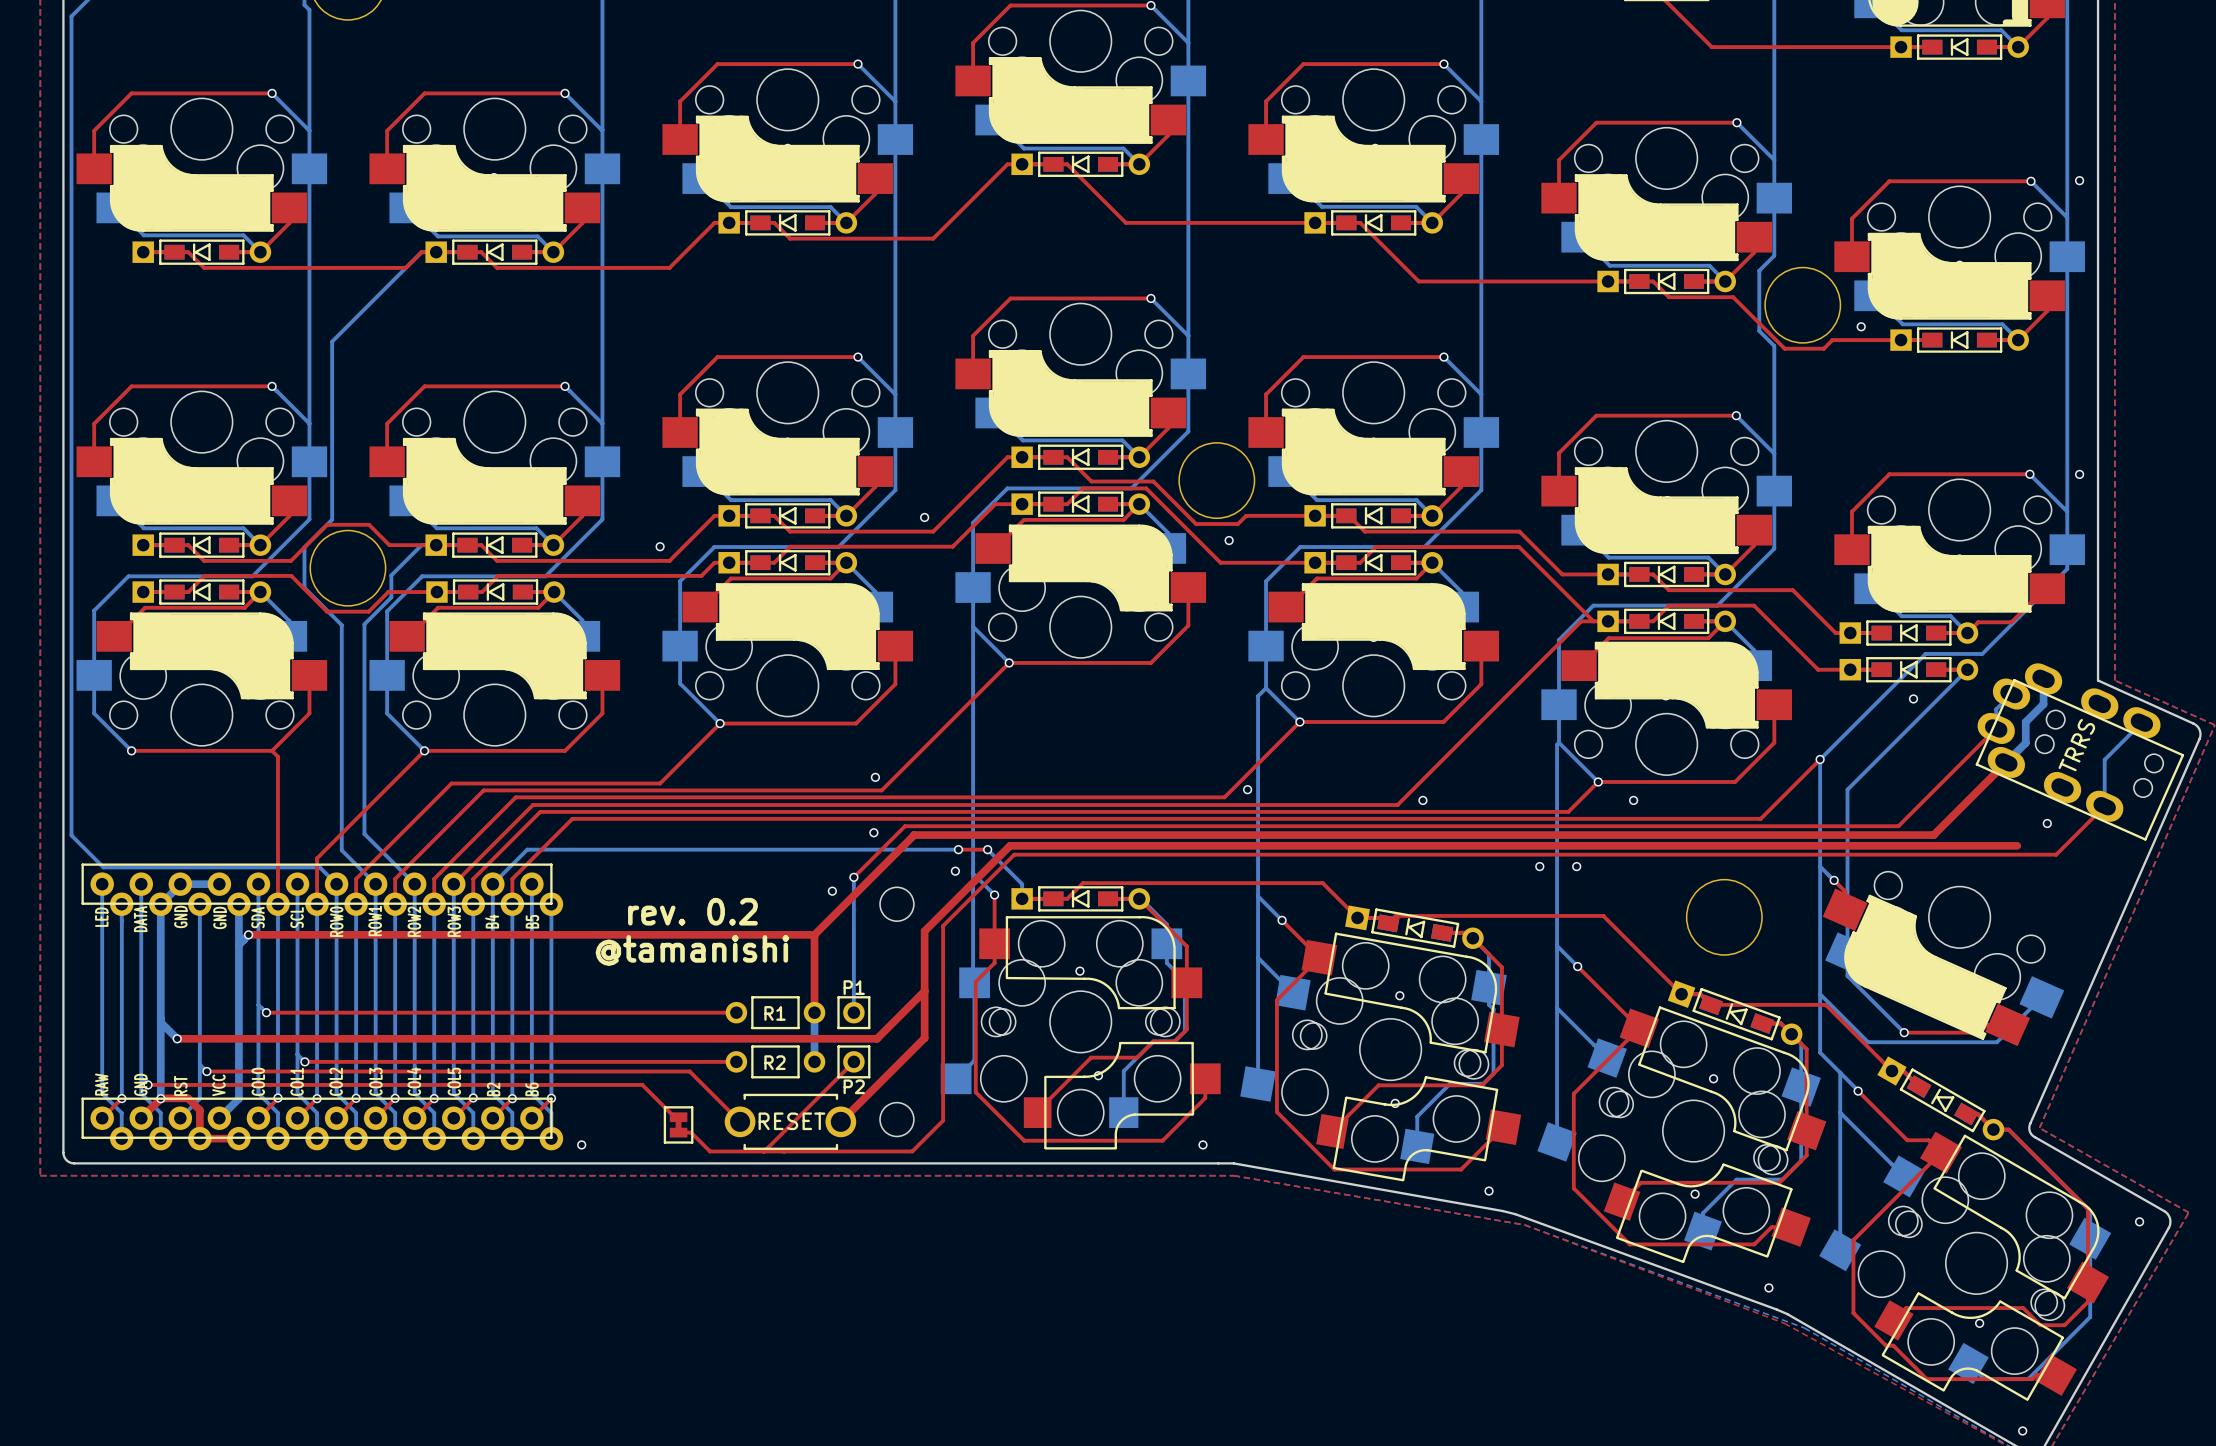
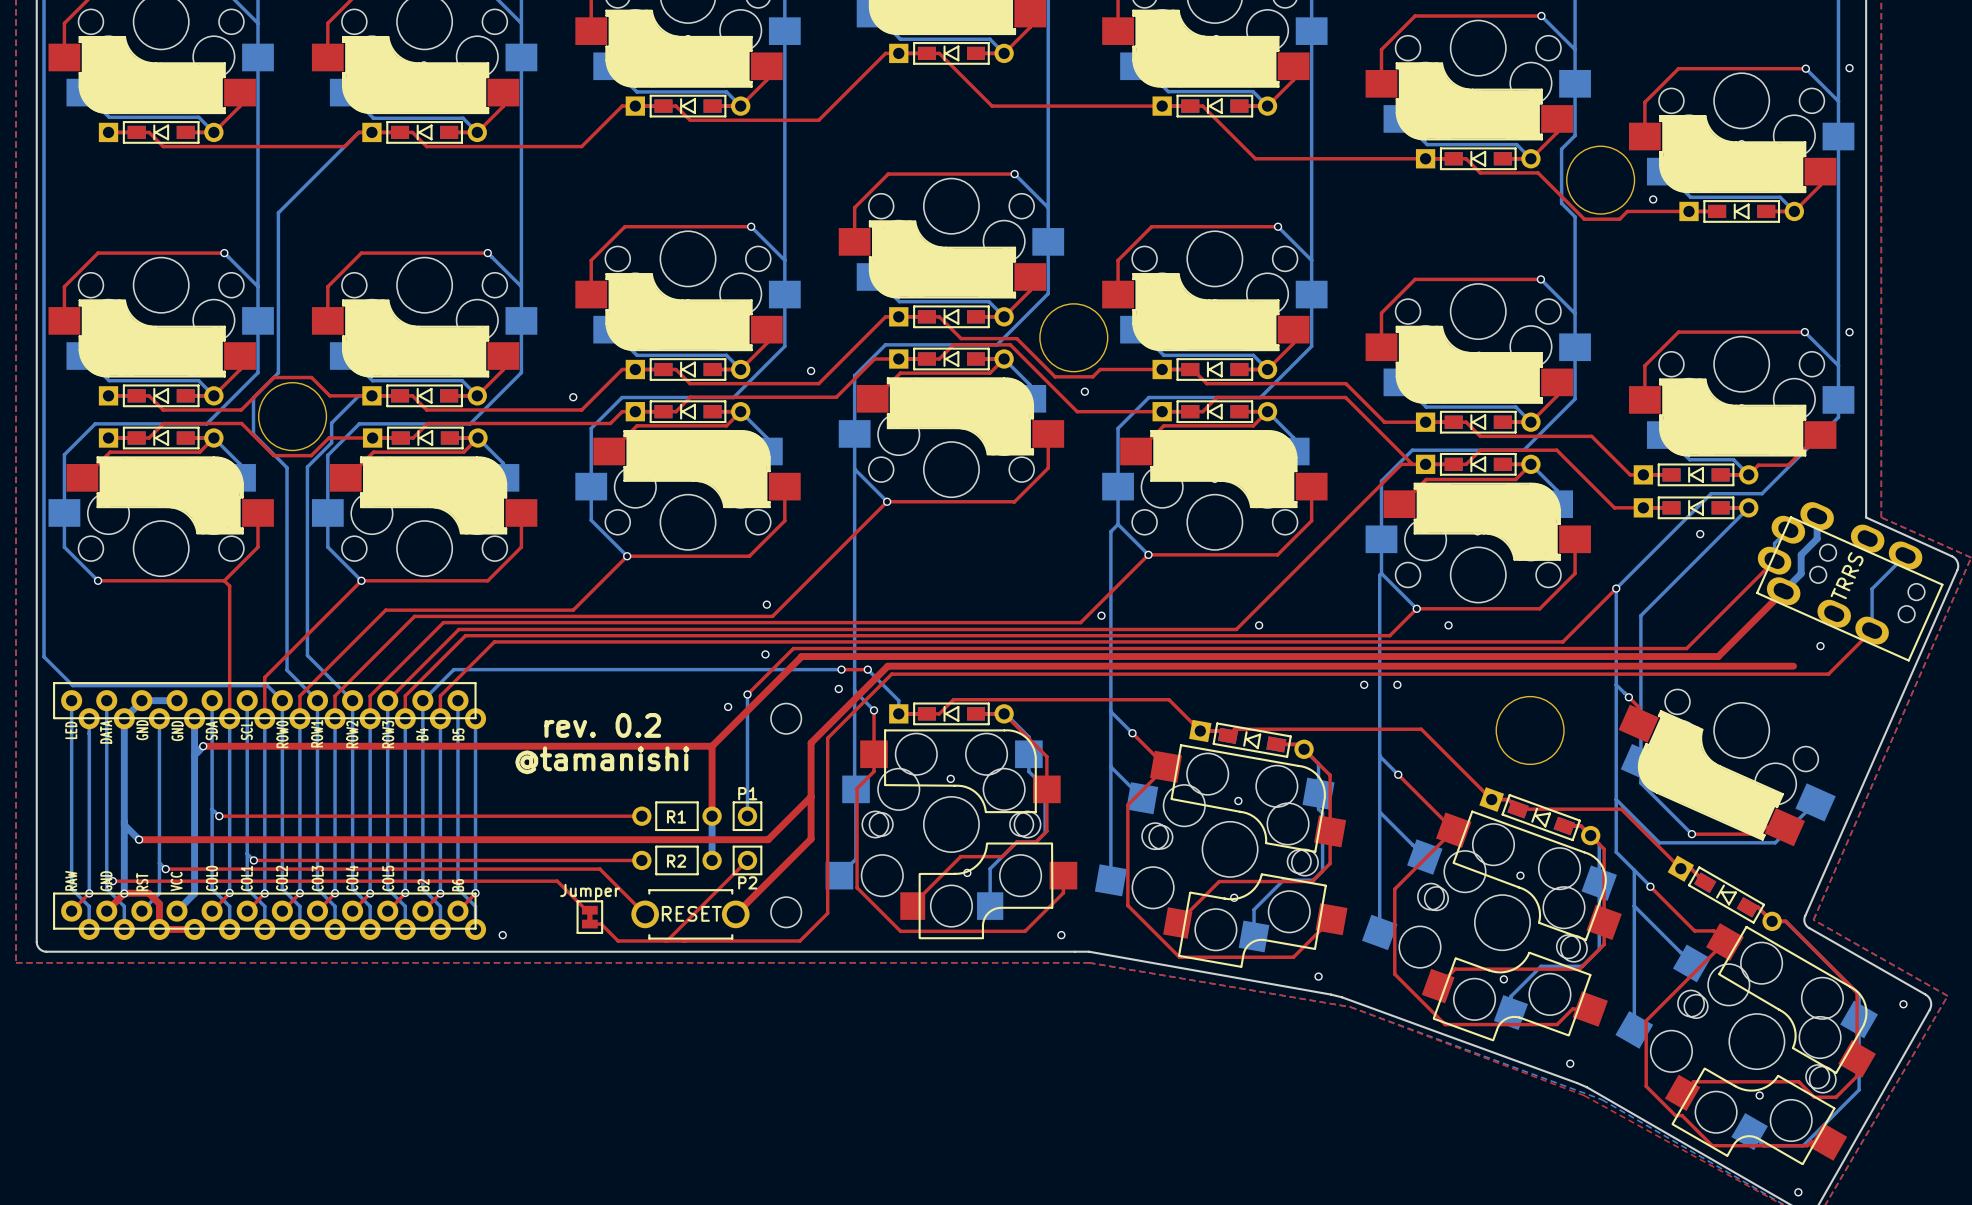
part value: none -> Jumper (590, 892)

